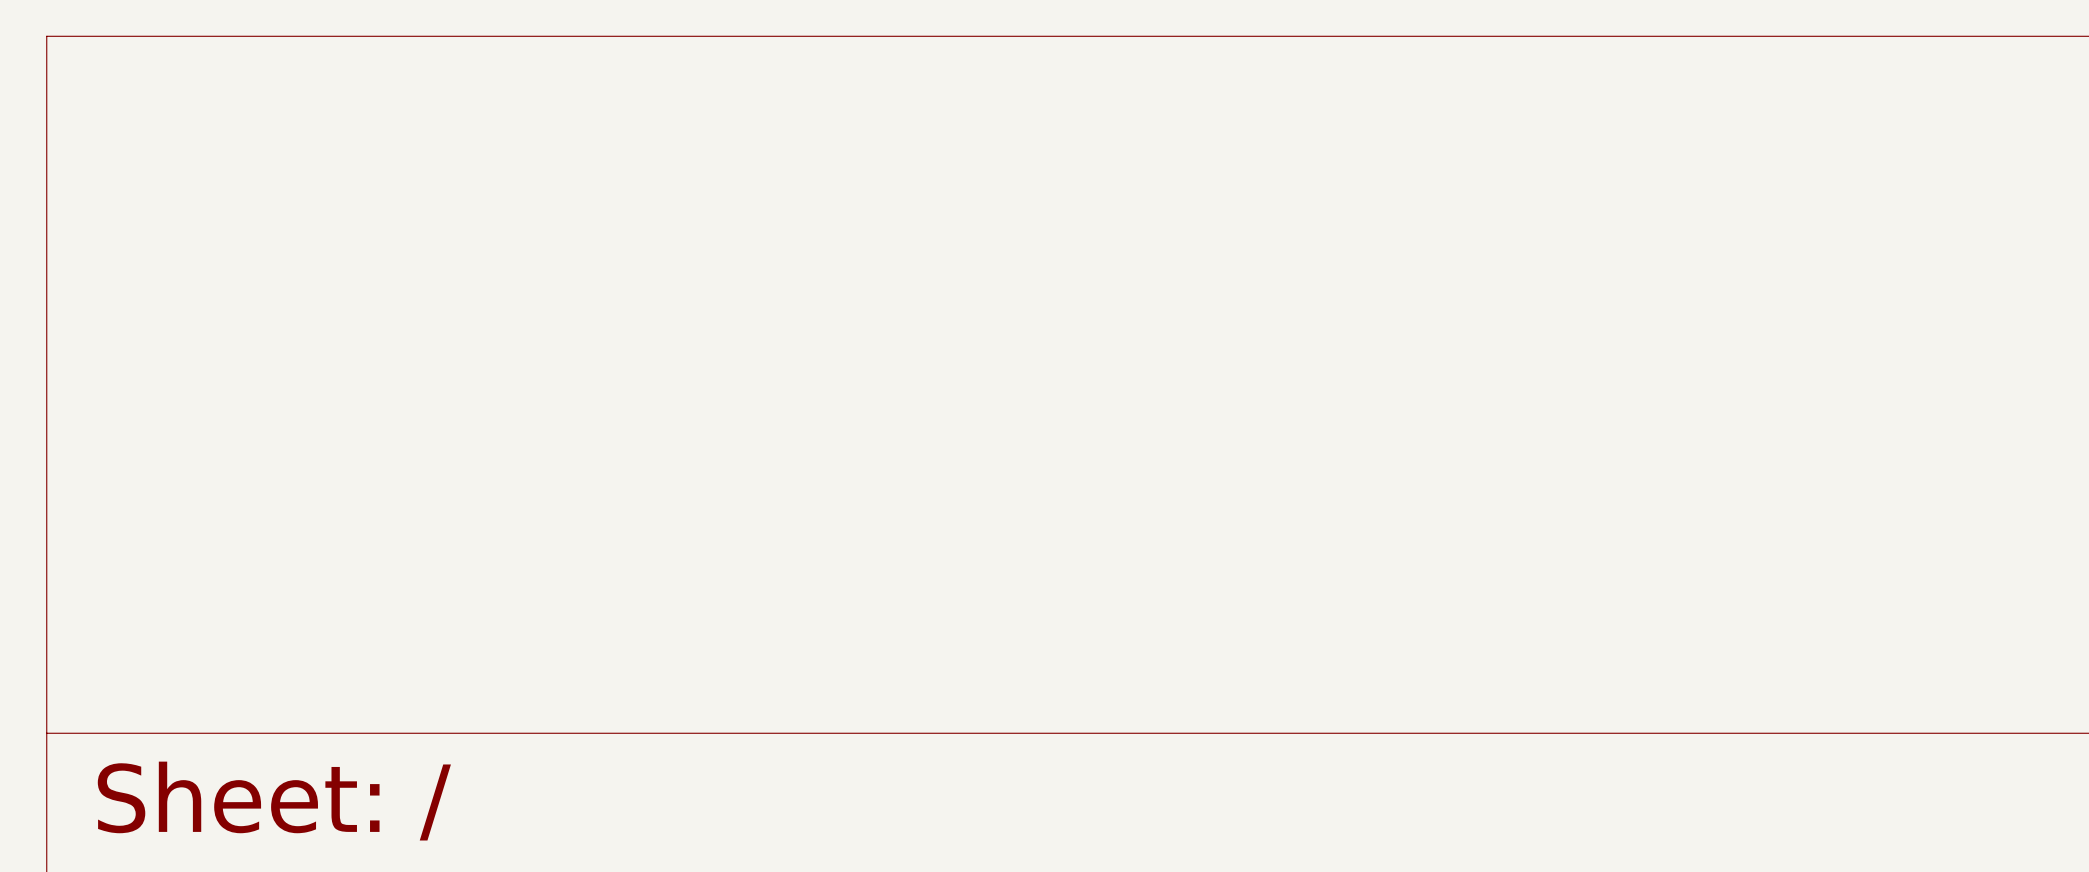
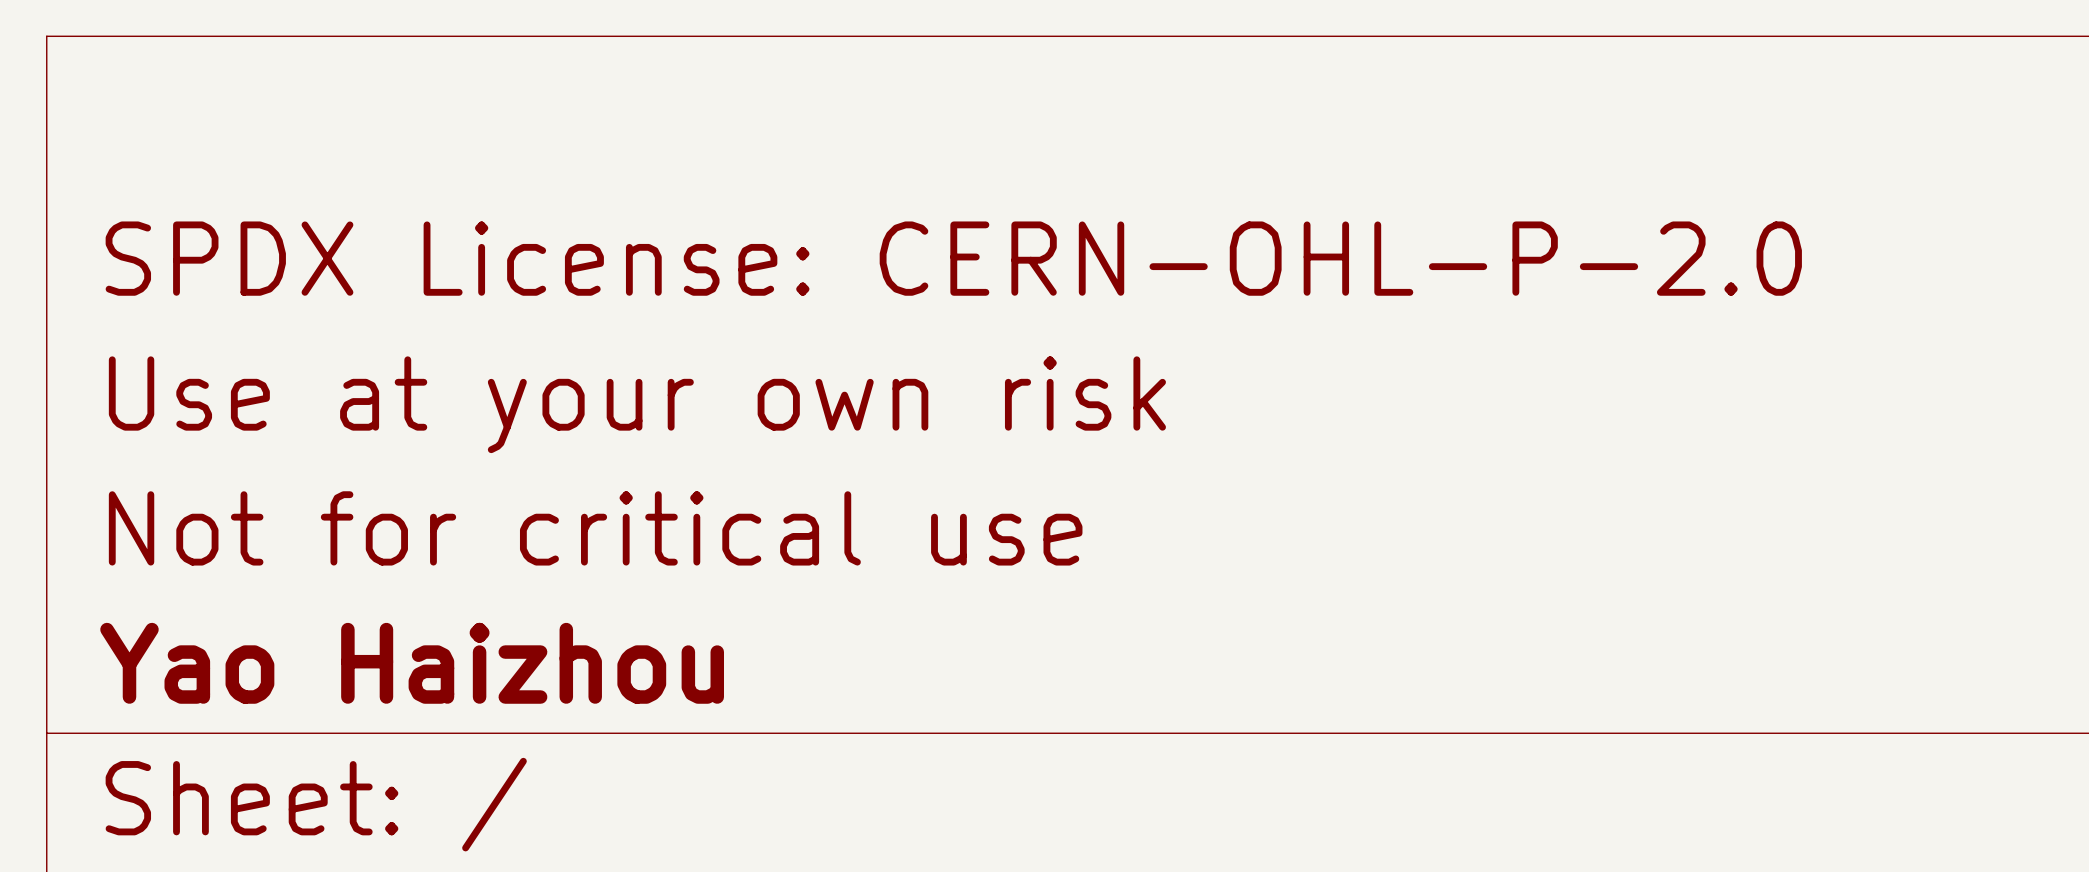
title block: none -> SPDX License: CERN-OHL-P-2.0 (953, 258)
title block: none -> Use at your own risk (637, 404)
title block: none -> Not for critical use (595, 528)
title block: none -> Yao Haizhou (412, 663)

